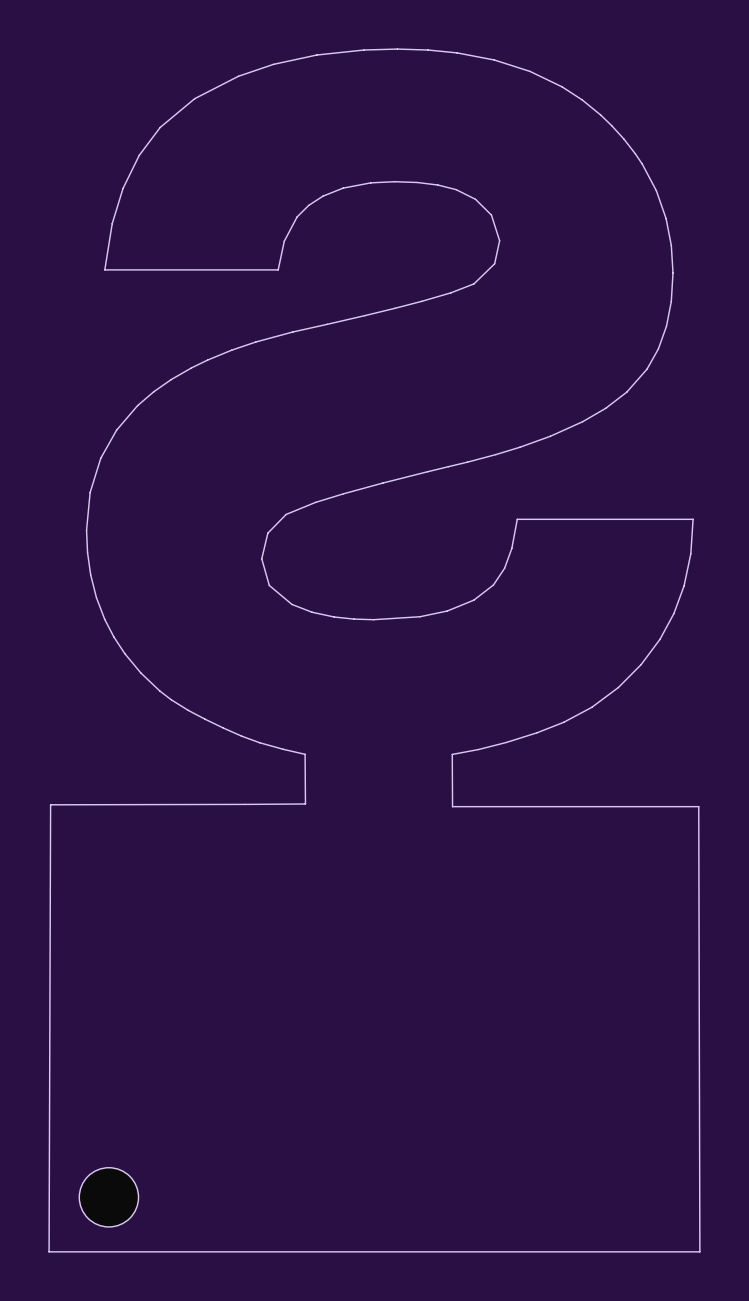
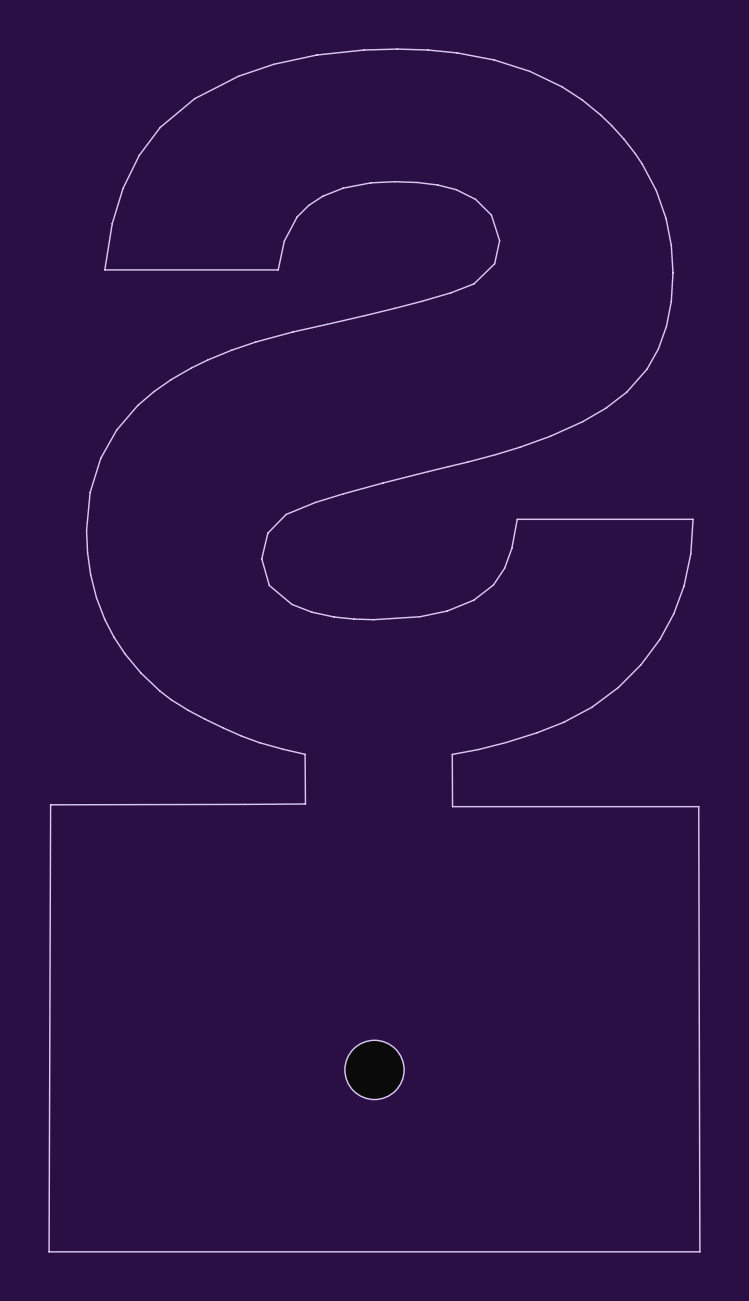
hole position: (108, 1197) -> (374, 1069)

